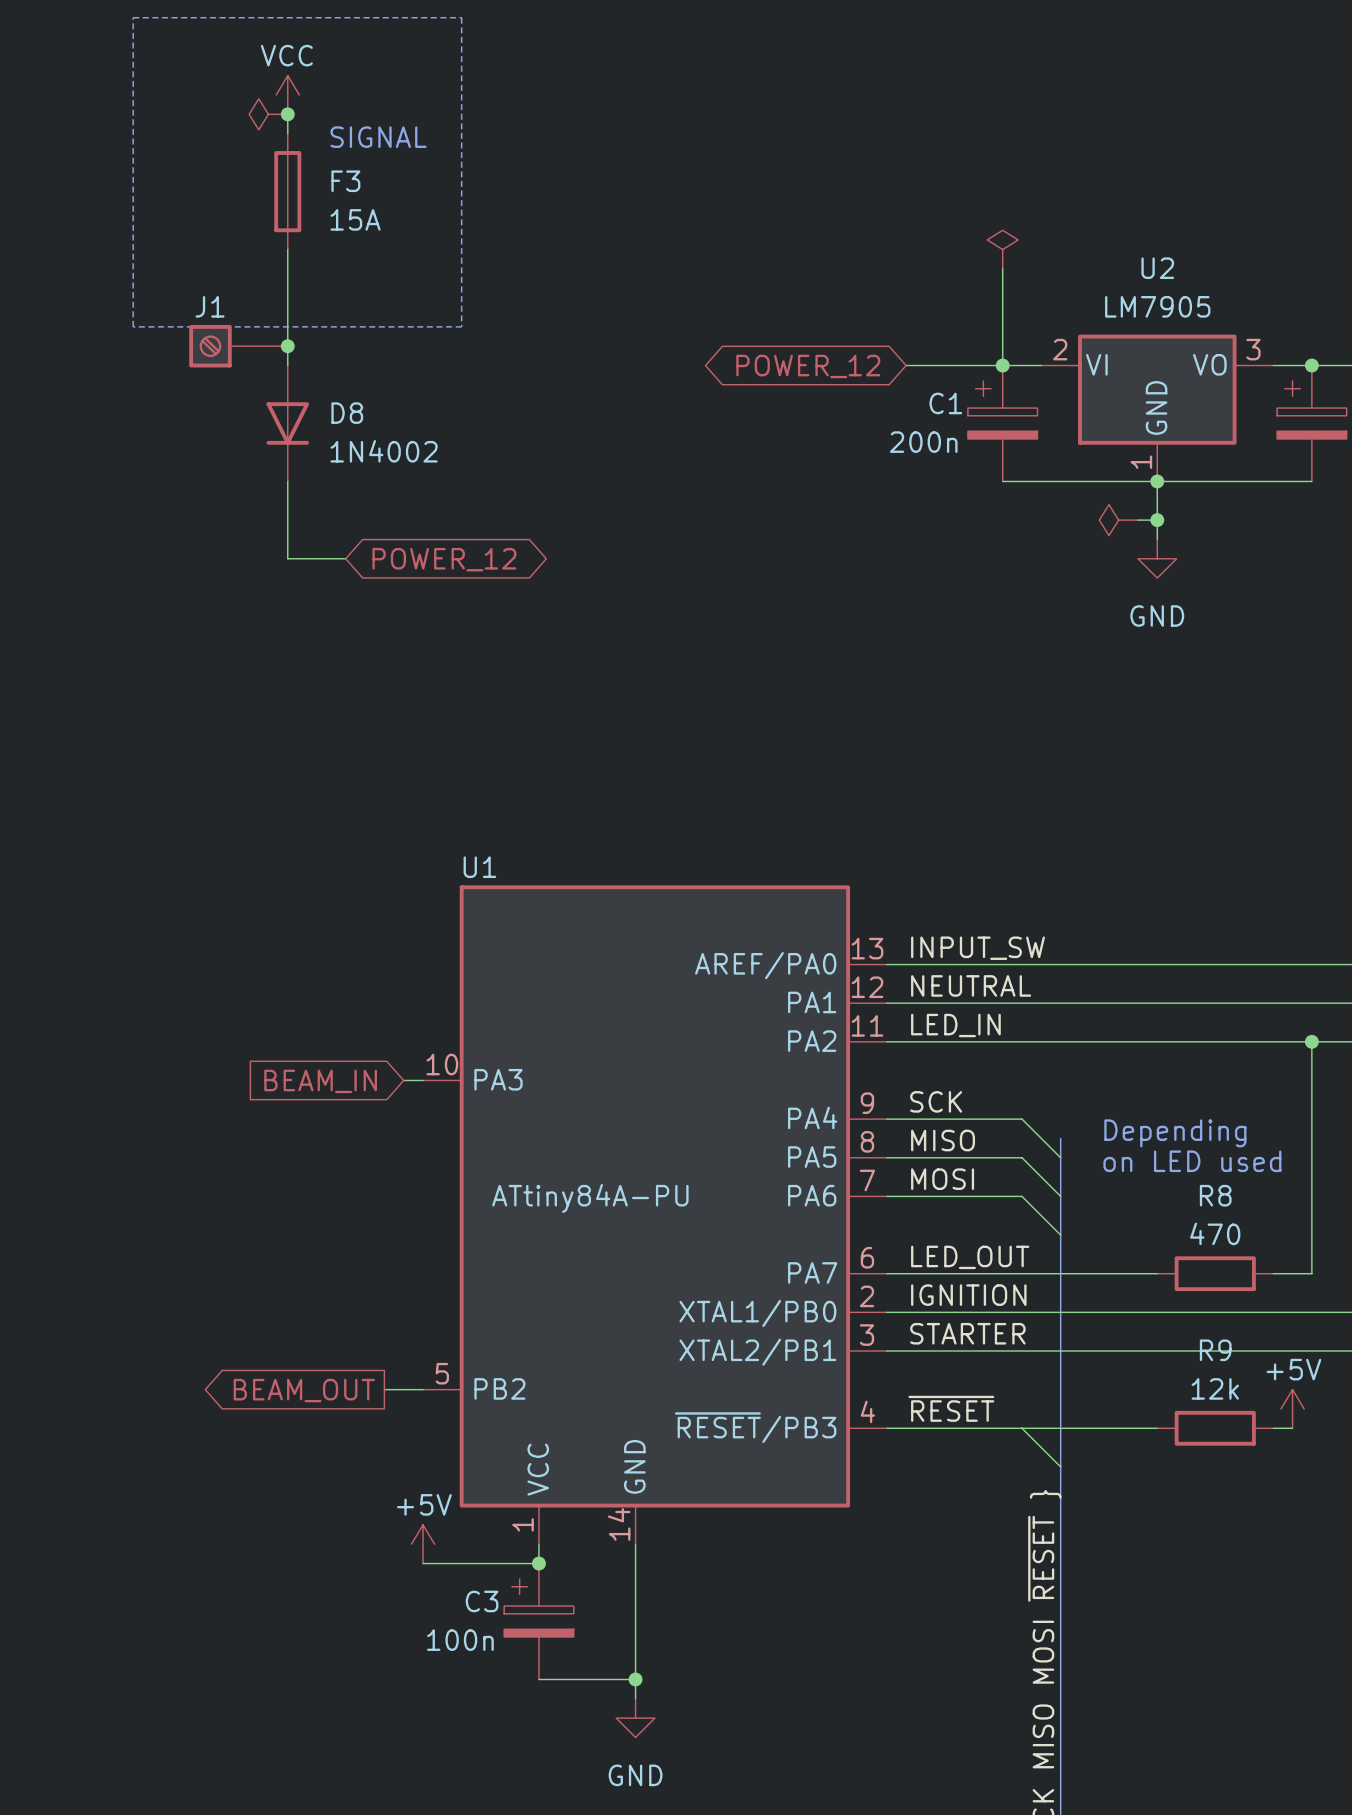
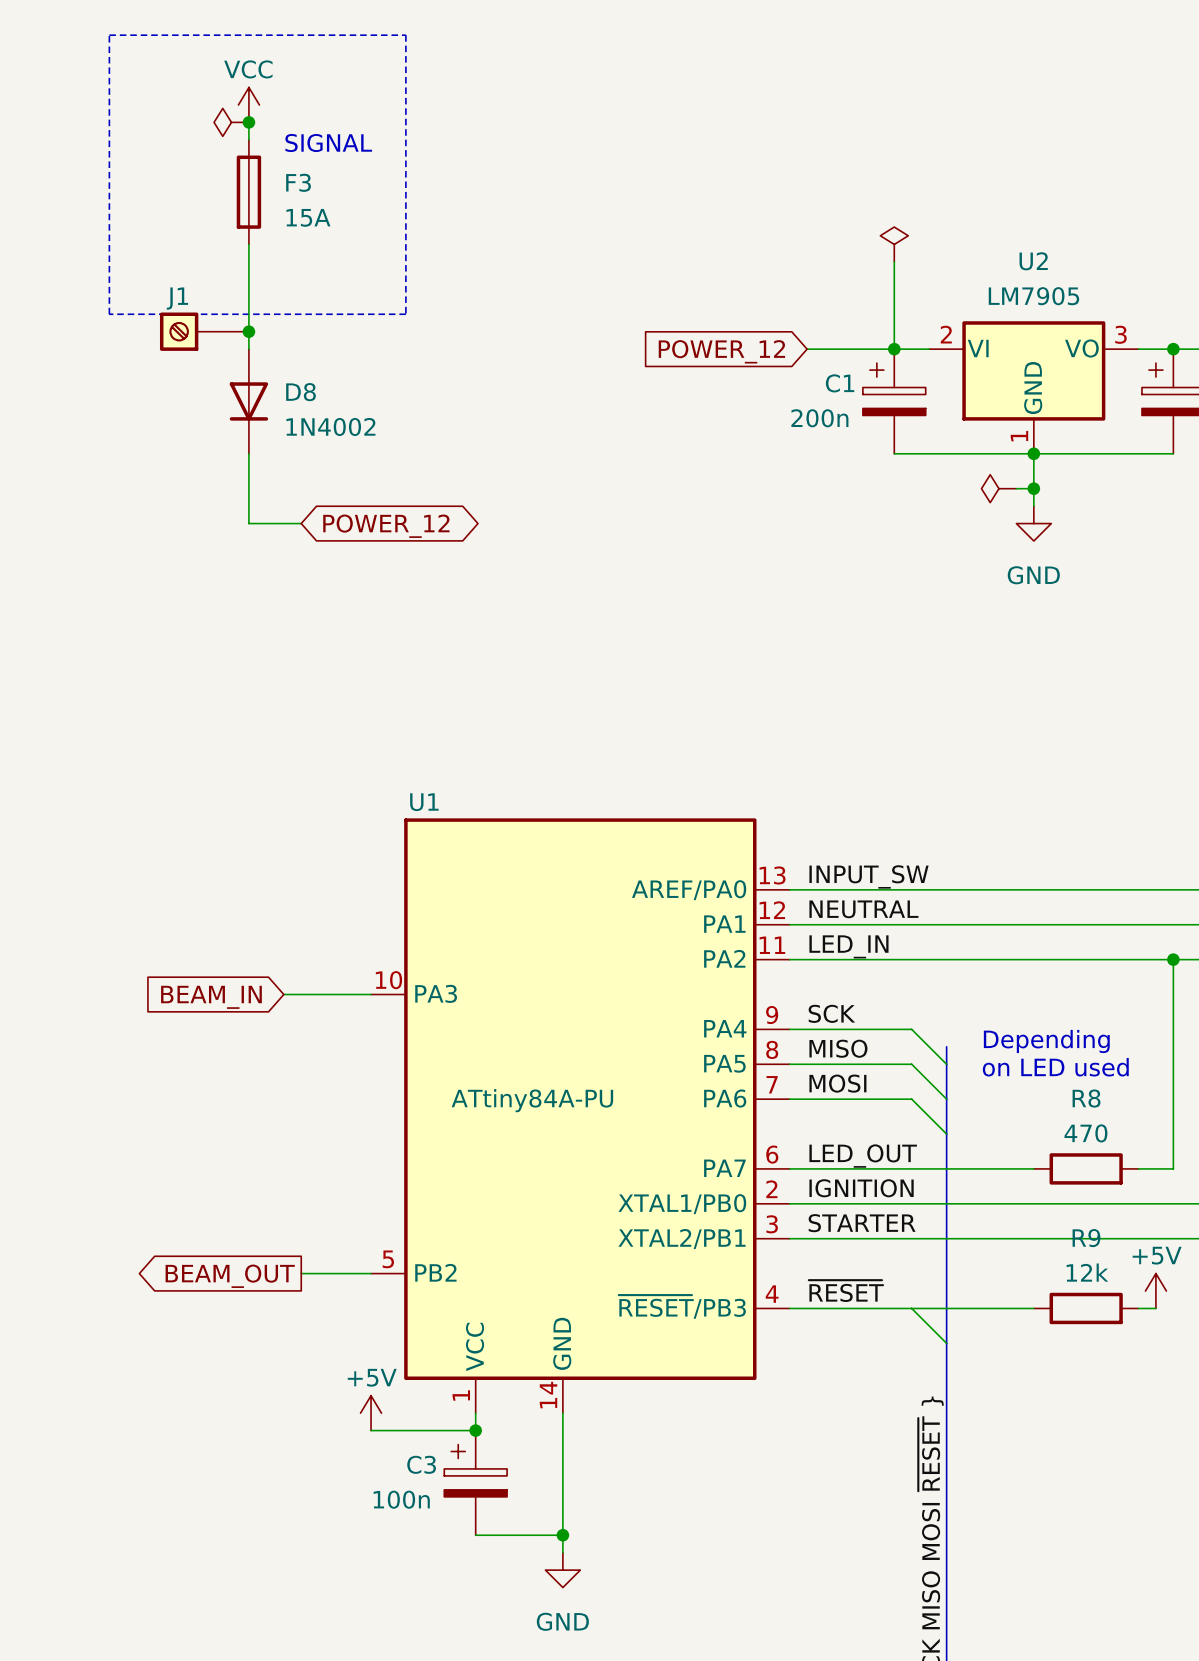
global label shape: bidirectional (808, 366) -> input (721, 351)
wire: none -> (283, 994) (353, 994)
global label position: BEAM_IN (320, 1081) -> BEAM_IN (211, 997)
wire: none -> (301, 1273) (336, 1273)
global label position: BEAM_OUT (304, 1390) -> BEAM_OUT (230, 1276)

